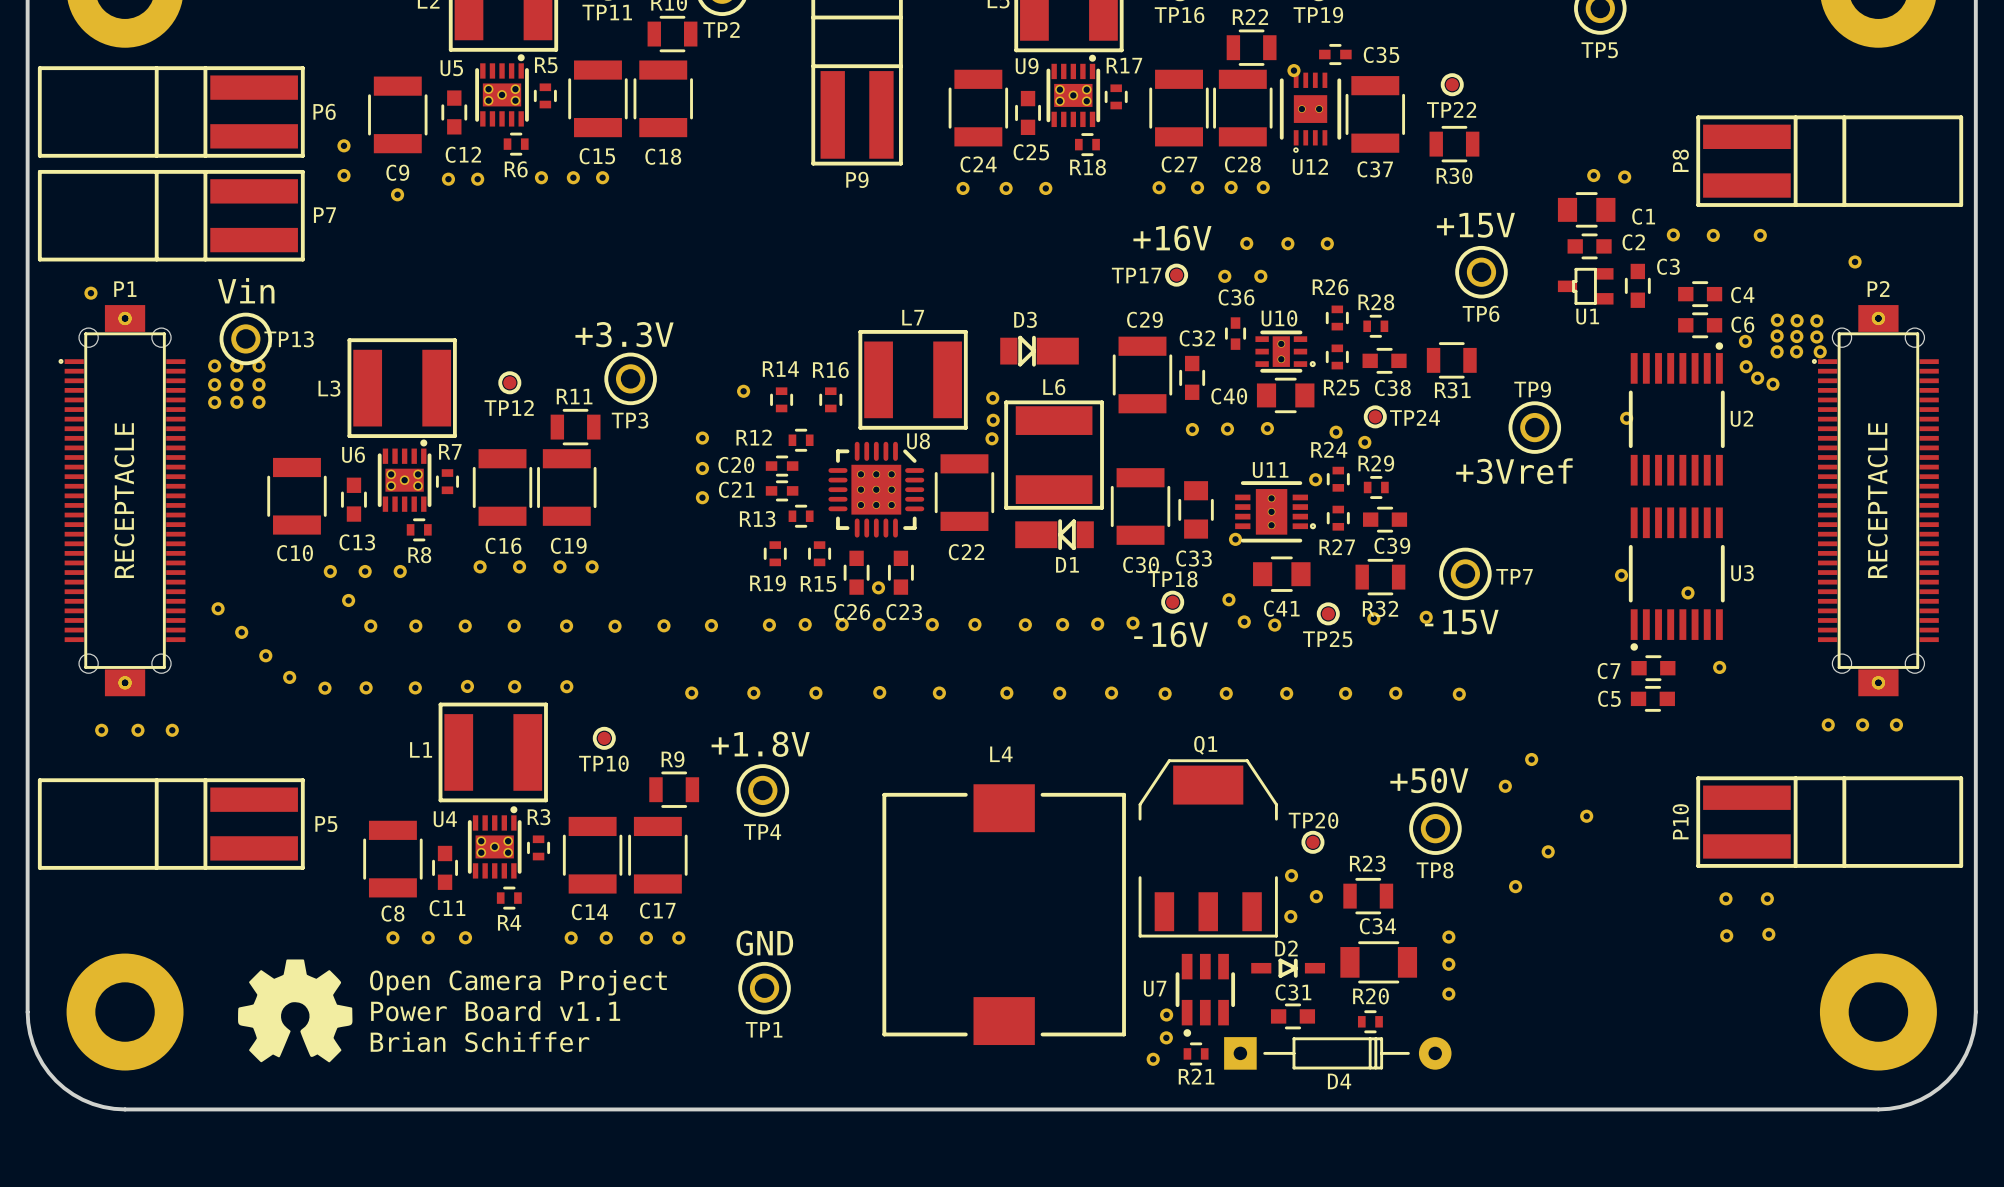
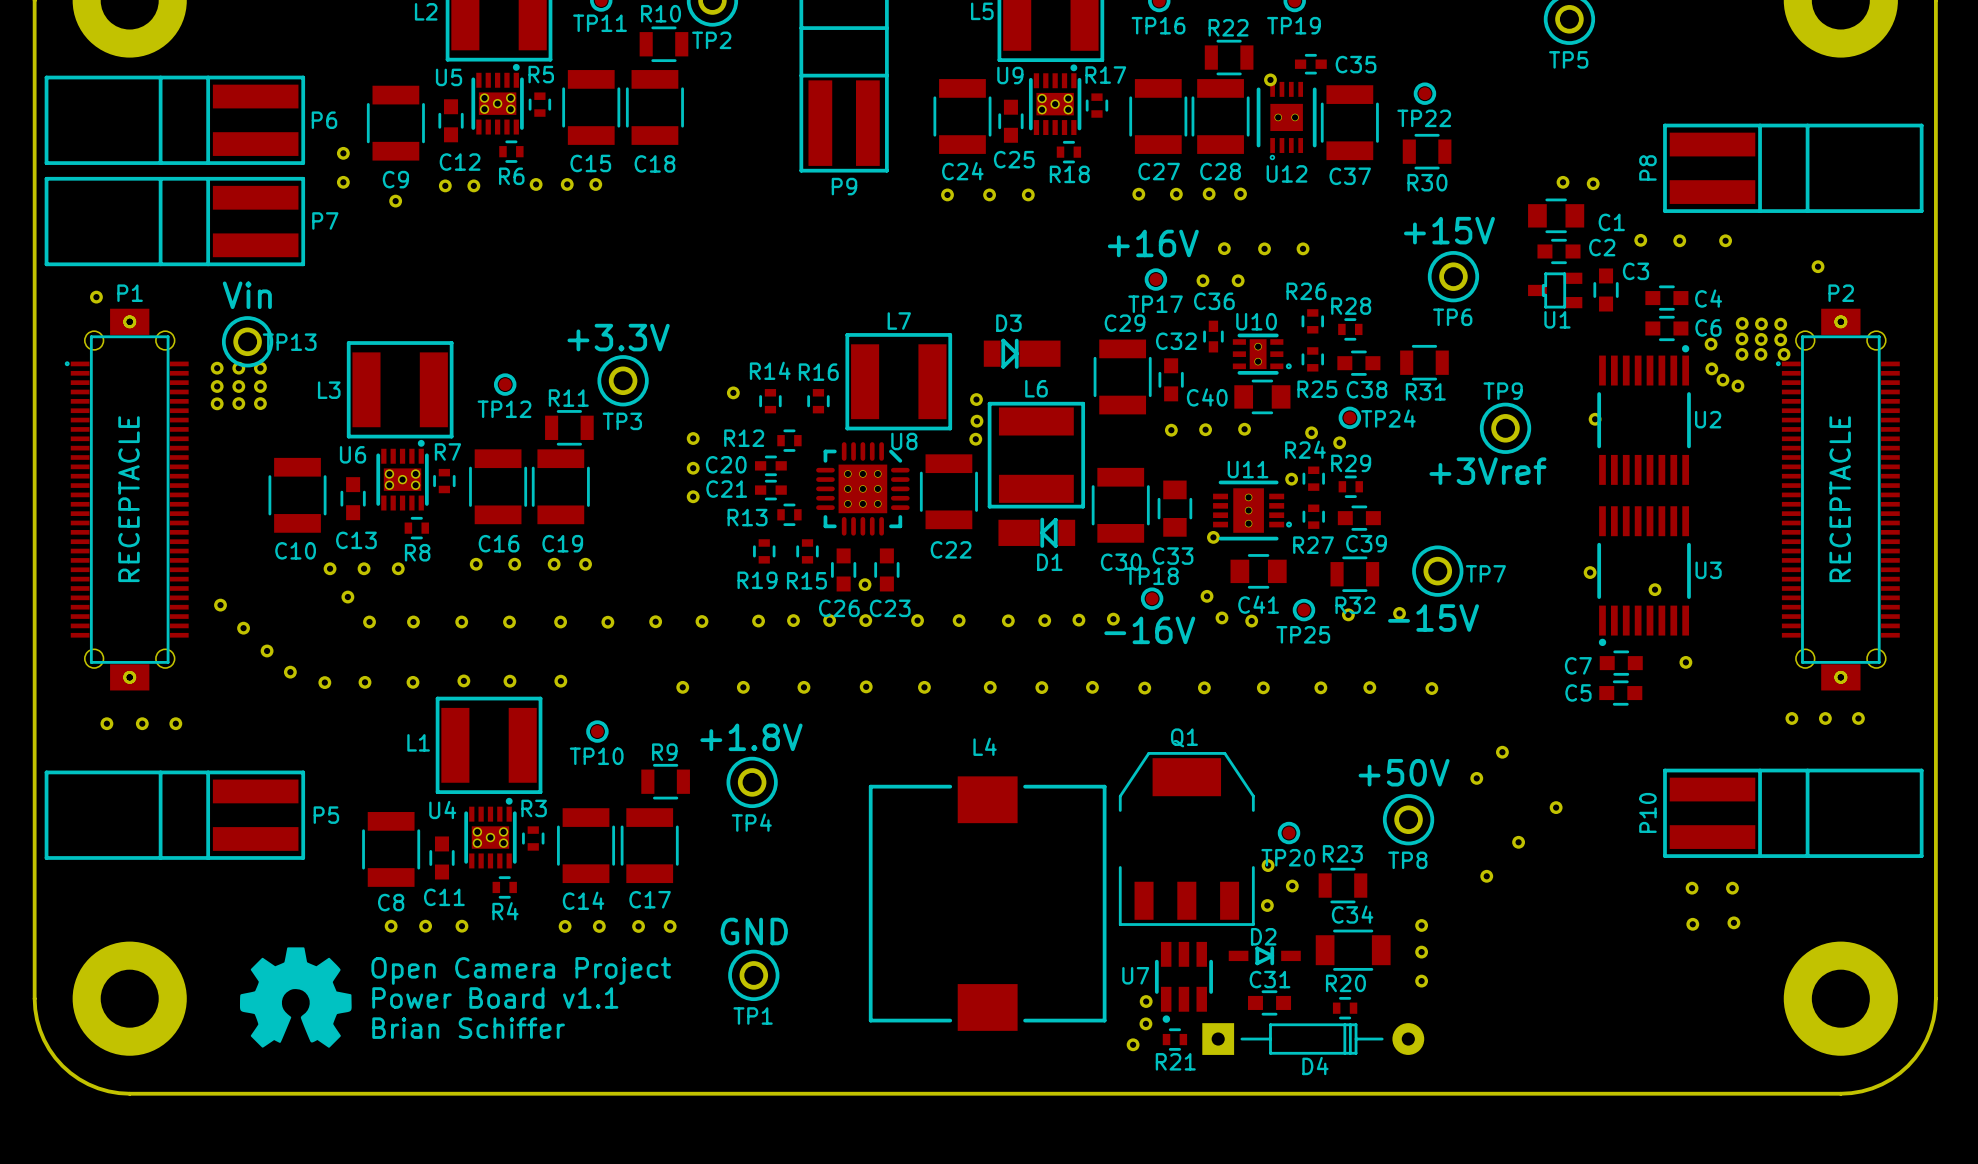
TP17 name position: TP17 (1136, 275) -> TP17 (1155, 304)
TP20 name position: TP20 (1313, 820) -> TP20 (1288, 857)

